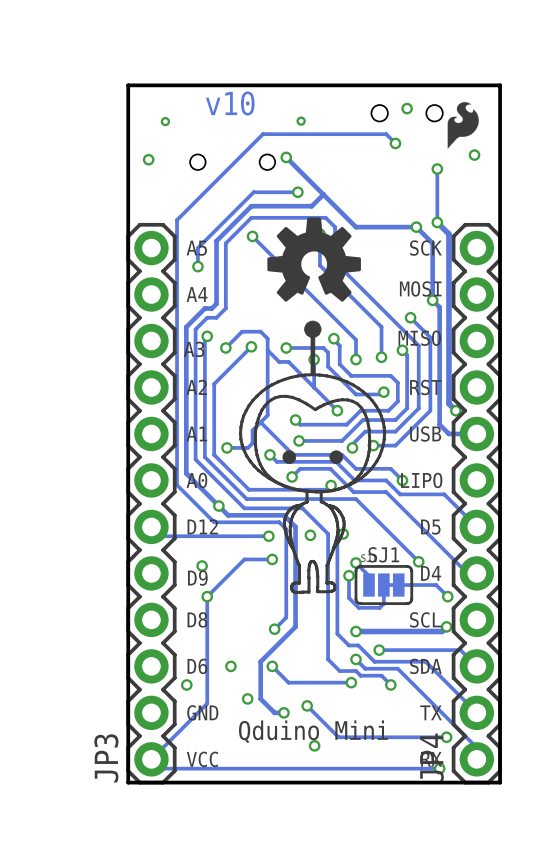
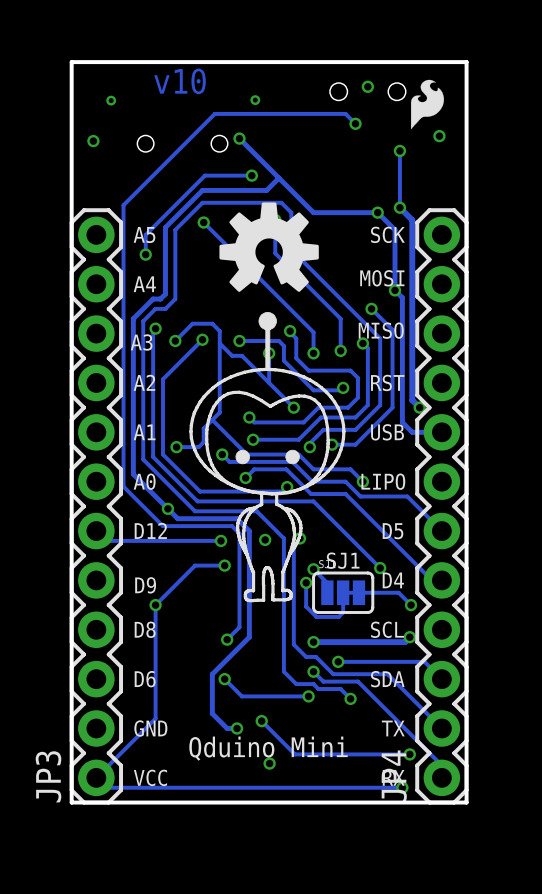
via: (202, 565) -> none
via: (230, 666) -> none
via: (186, 684) -> none
via: (247, 698) -> none

